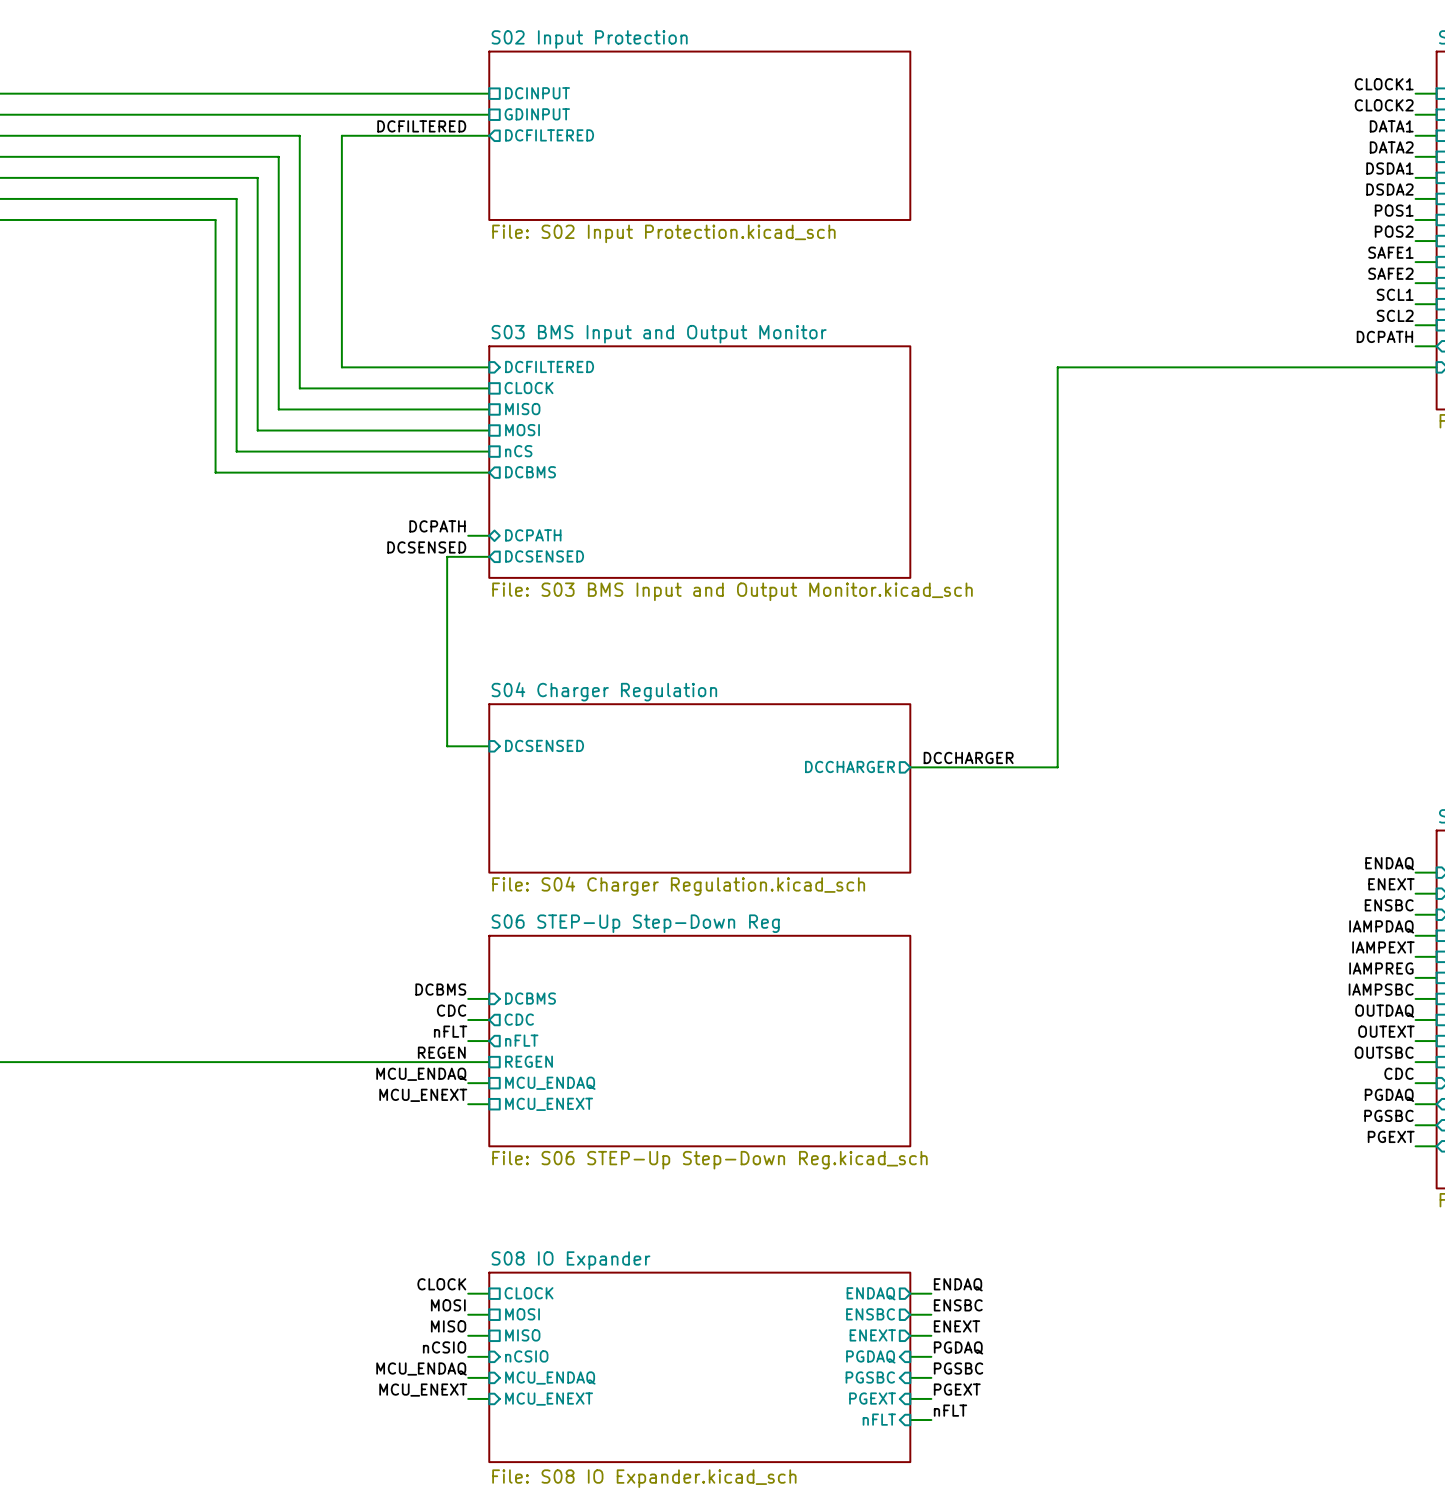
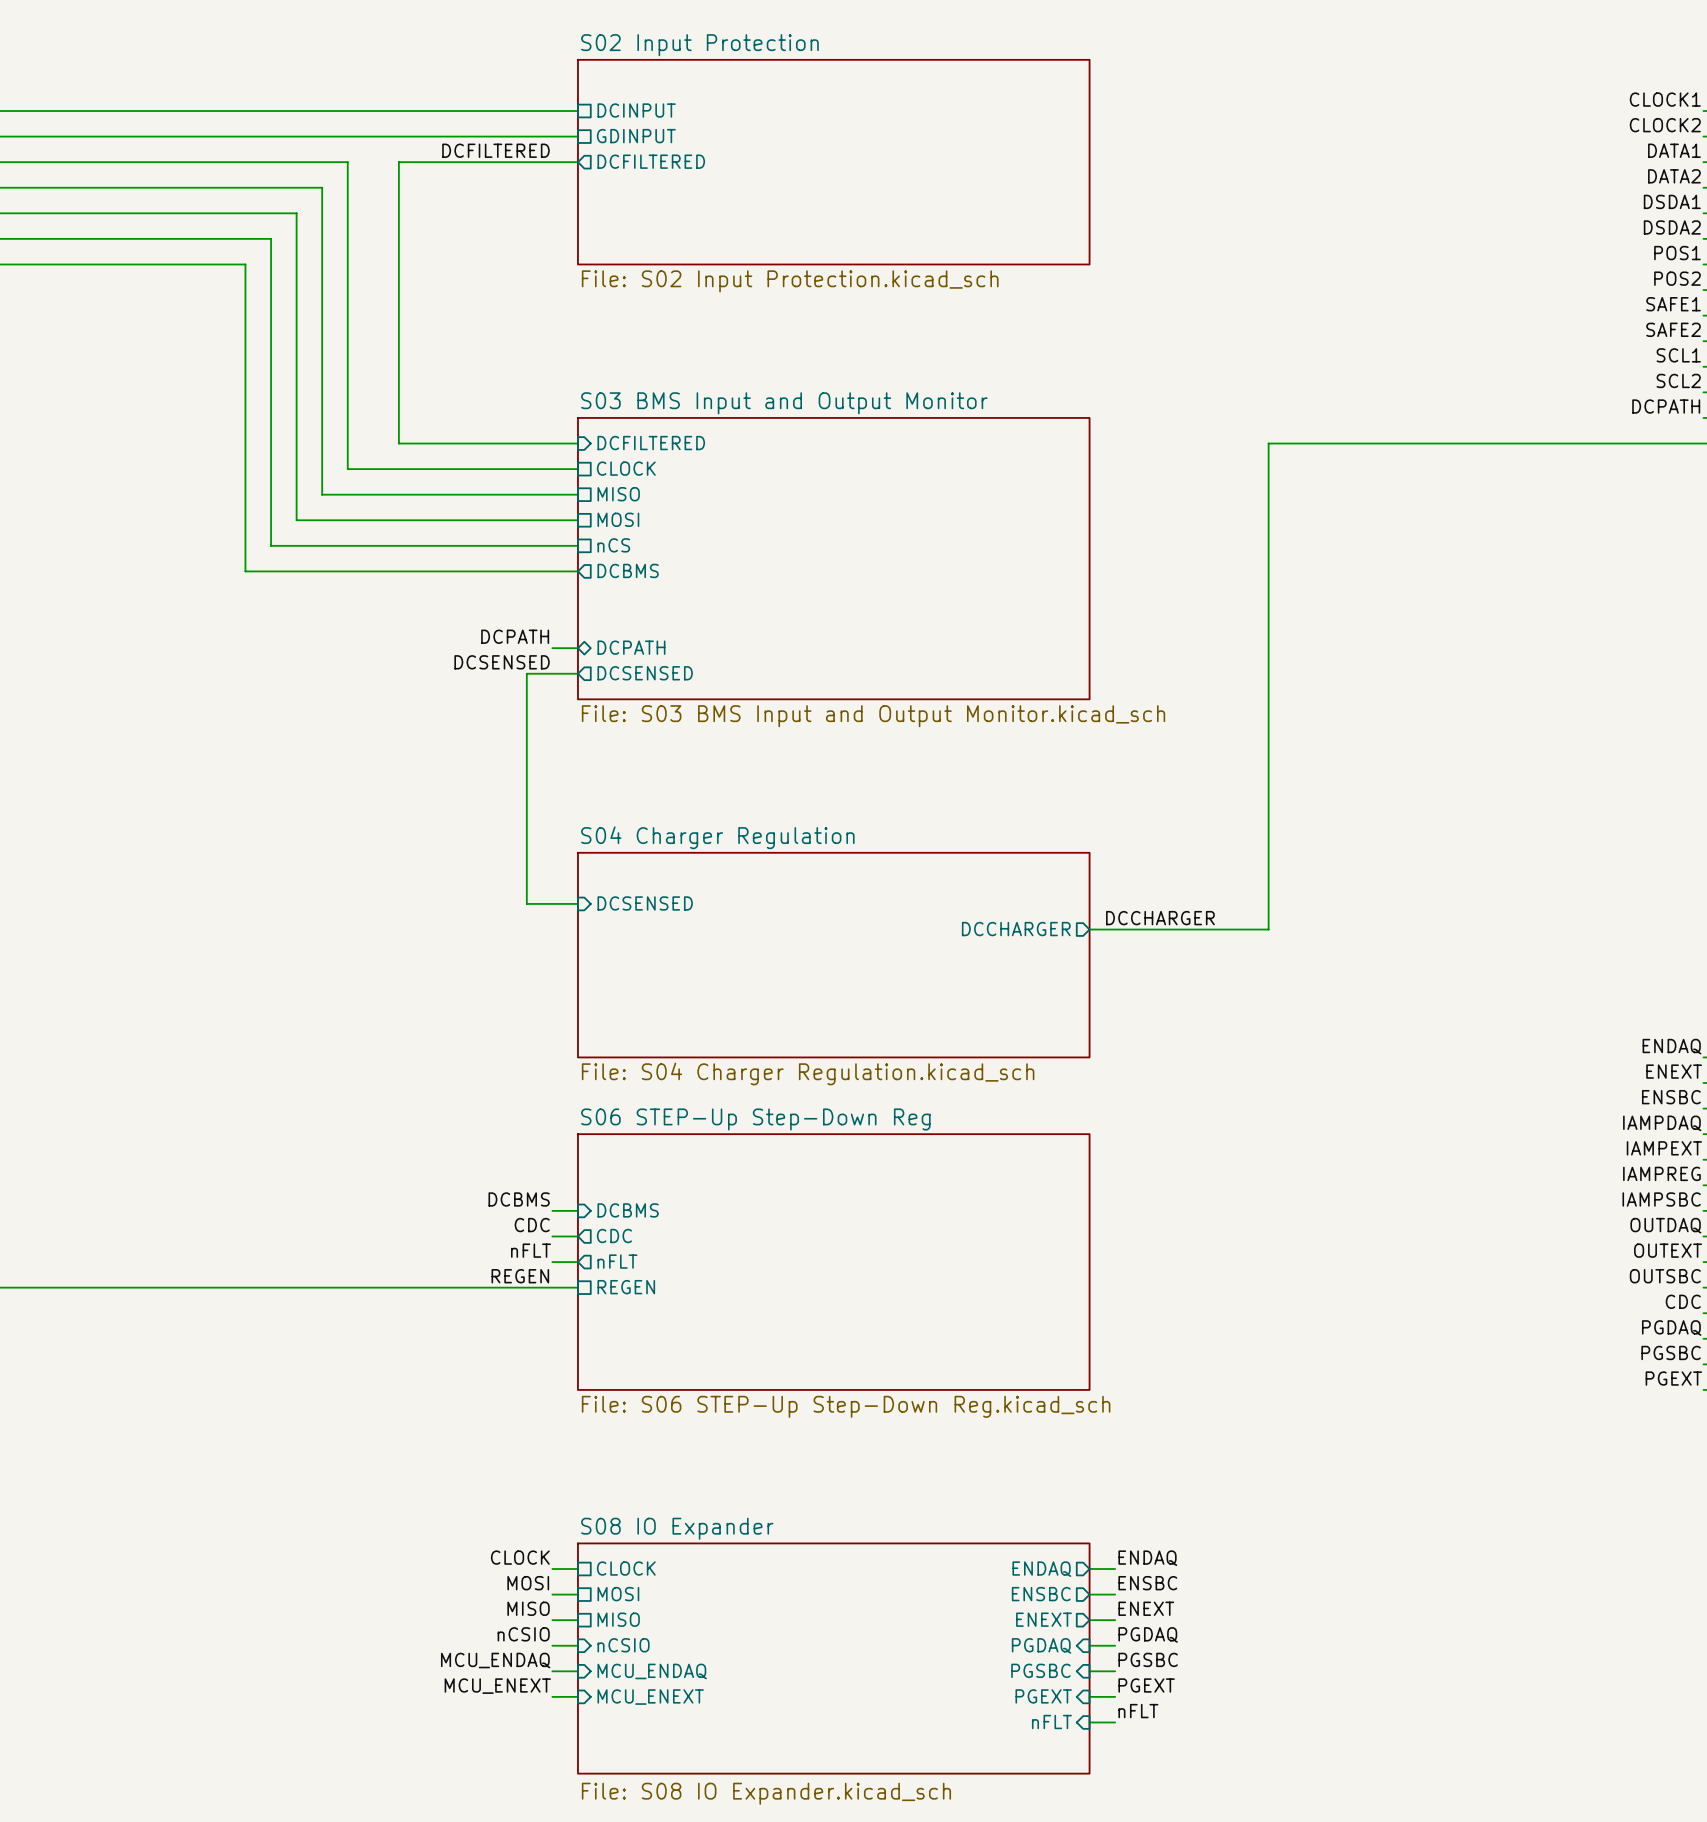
label: MCU_ENDAQ (421, 1074) -> none
wire: (468, 1083) (489, 1083) -> none
sheet pin: MCU_ENDAQ (550, 1083) -> none
label: MCU_ENEXT (423, 1095) -> none
wire: (468, 1104) (489, 1104) -> none
sheet pin: MCU_ENEXT (549, 1104) -> none

